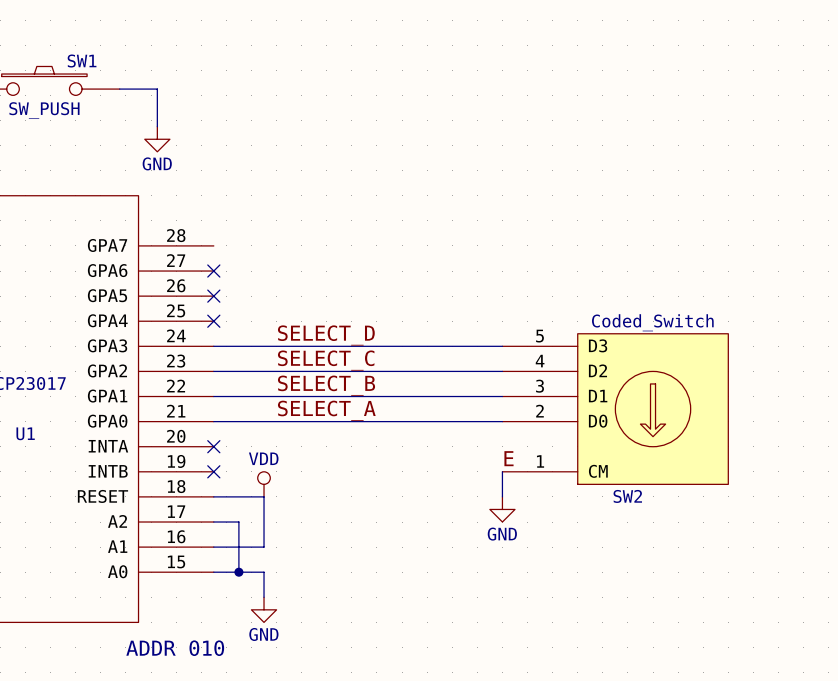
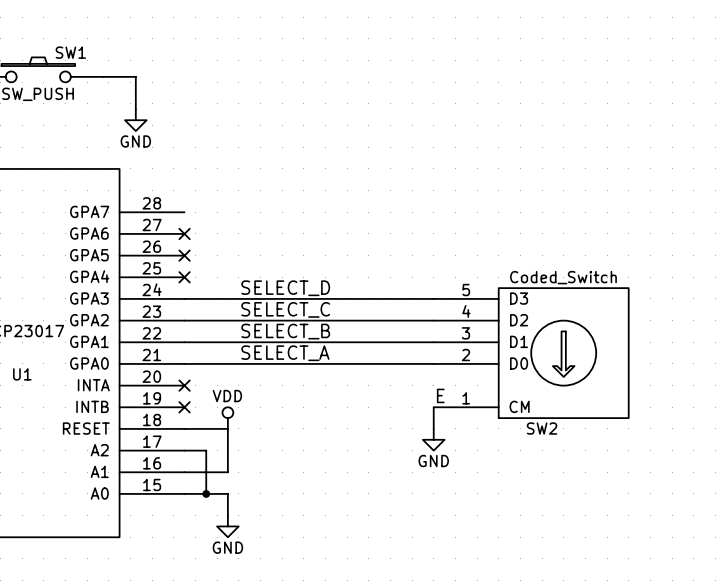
text: ADDR 010 (175, 648) -> none

